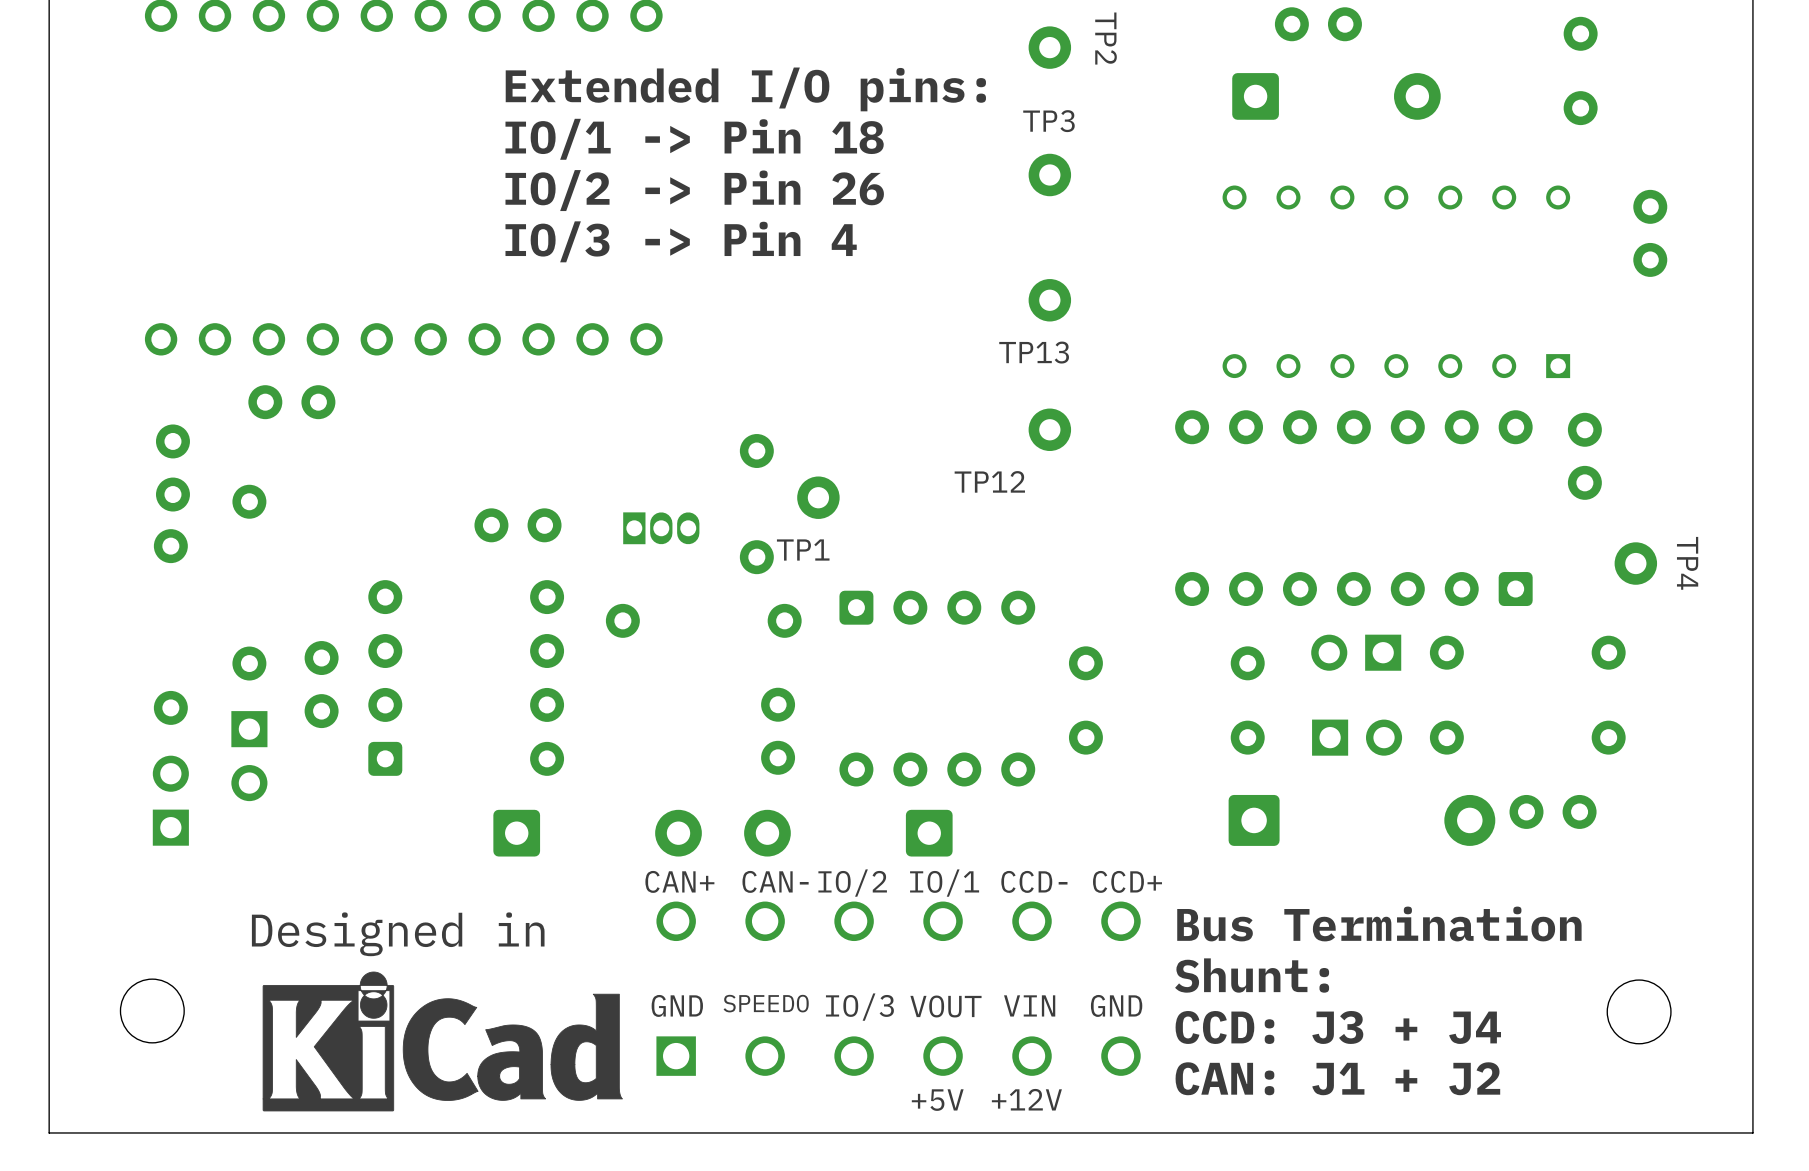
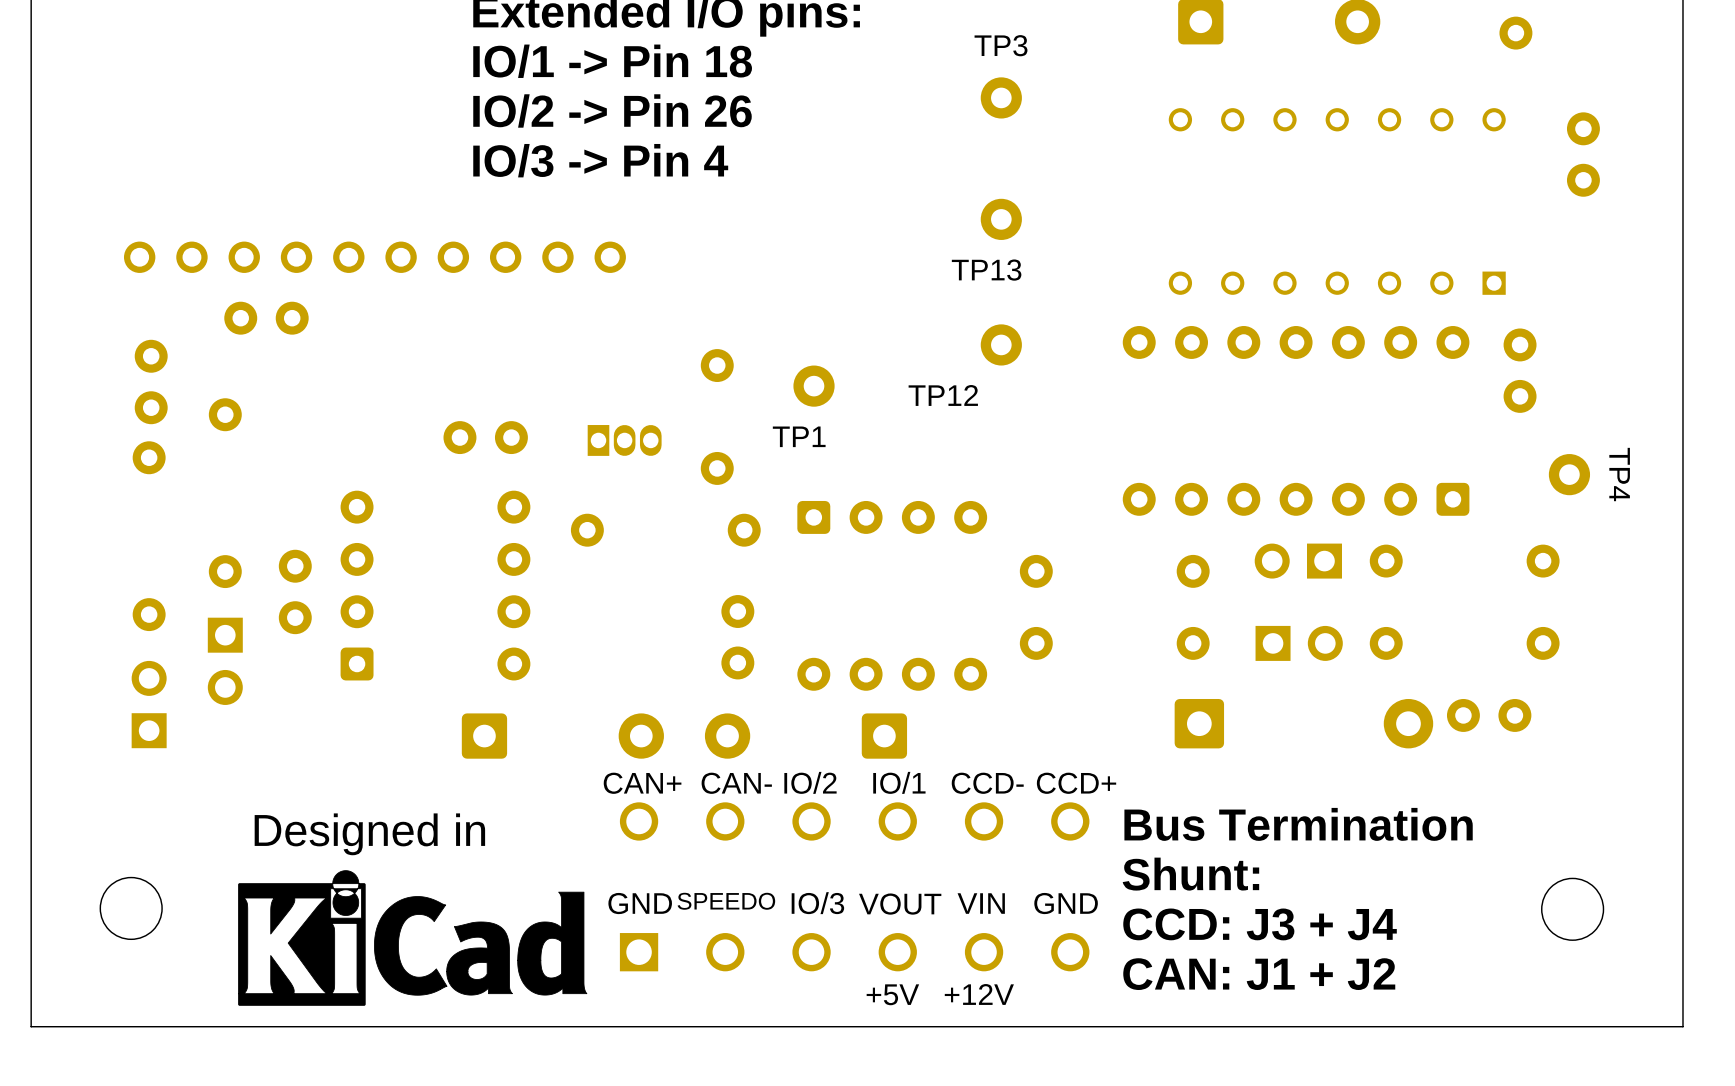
TP1 position: (818, 497) -> (814, 386)

